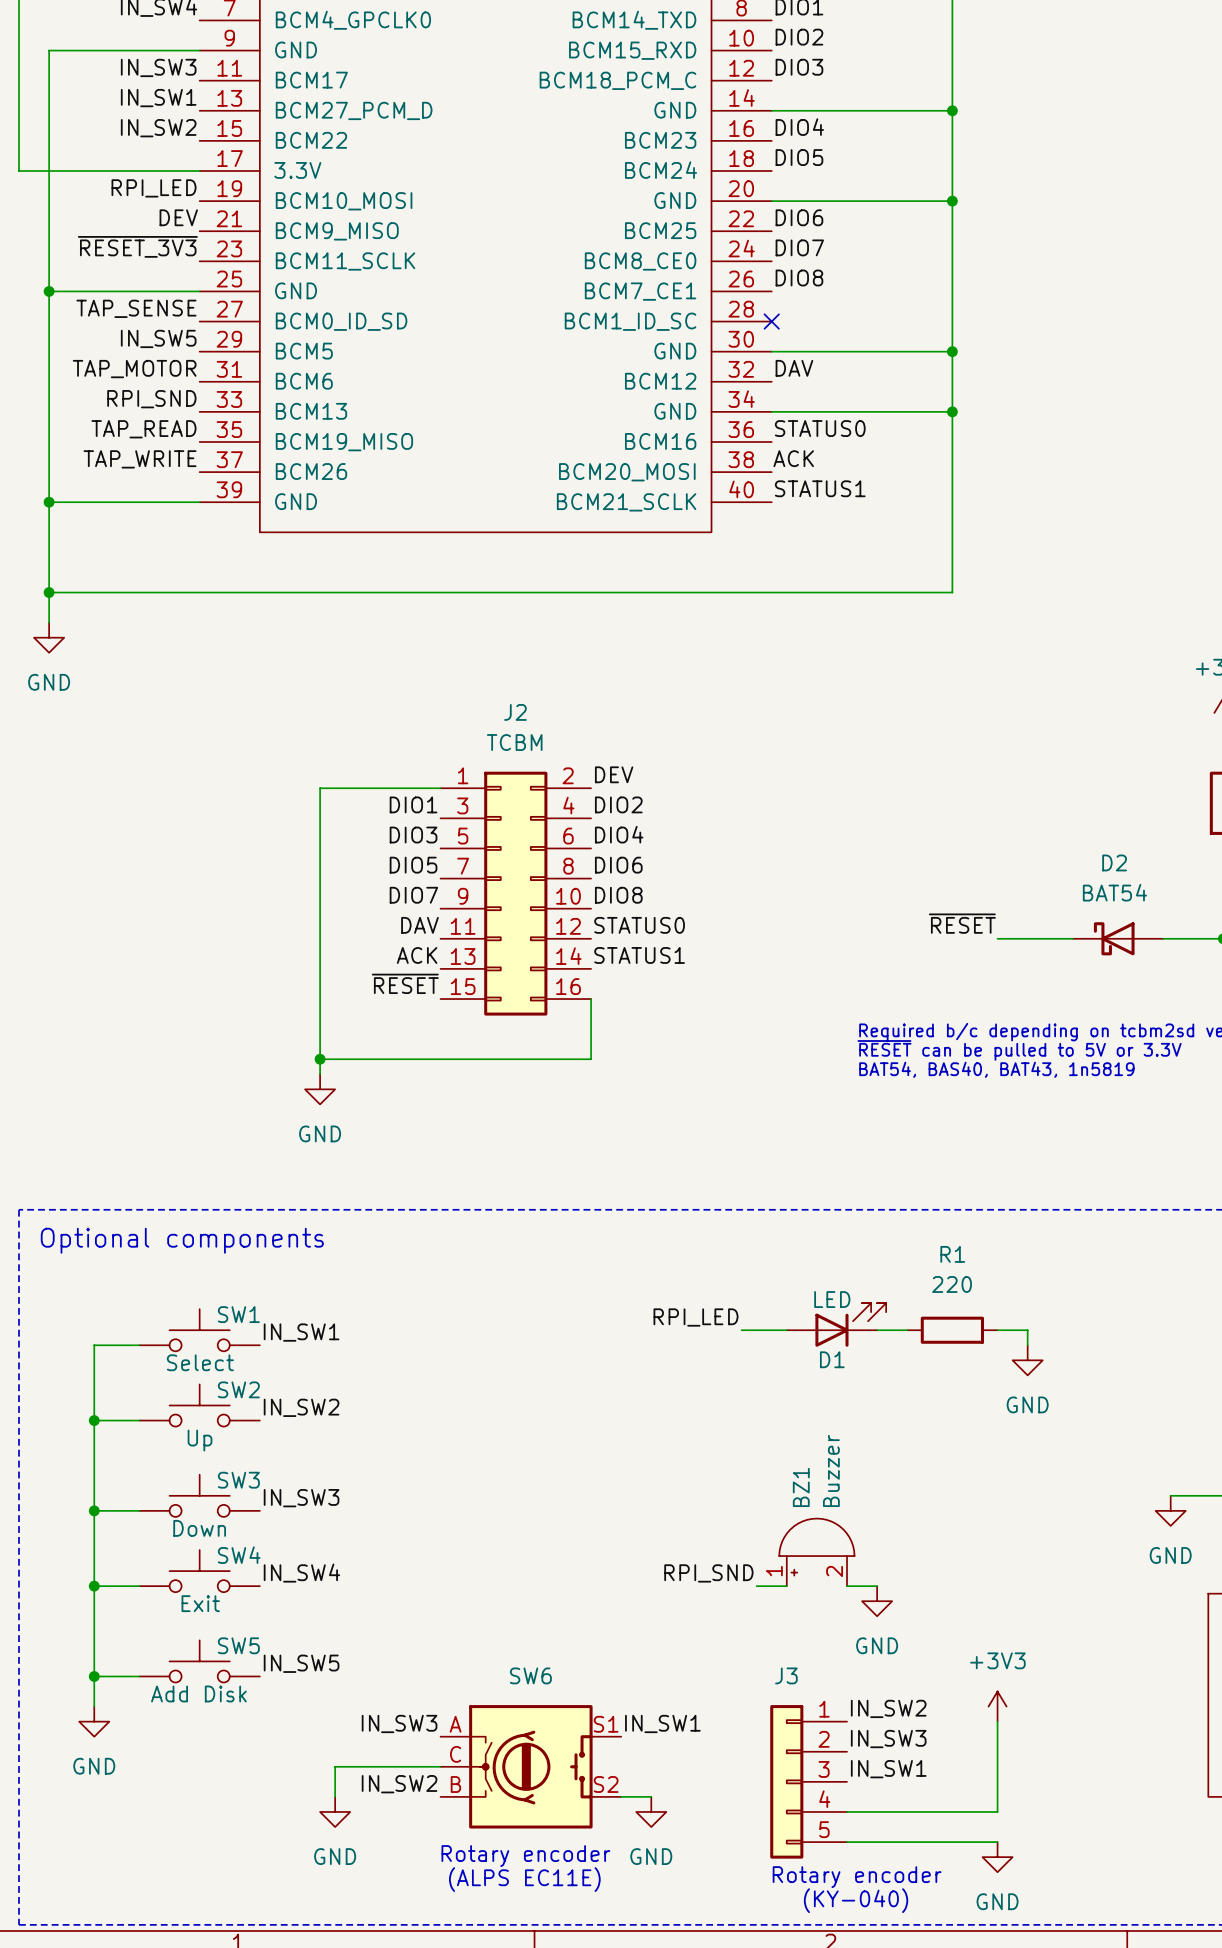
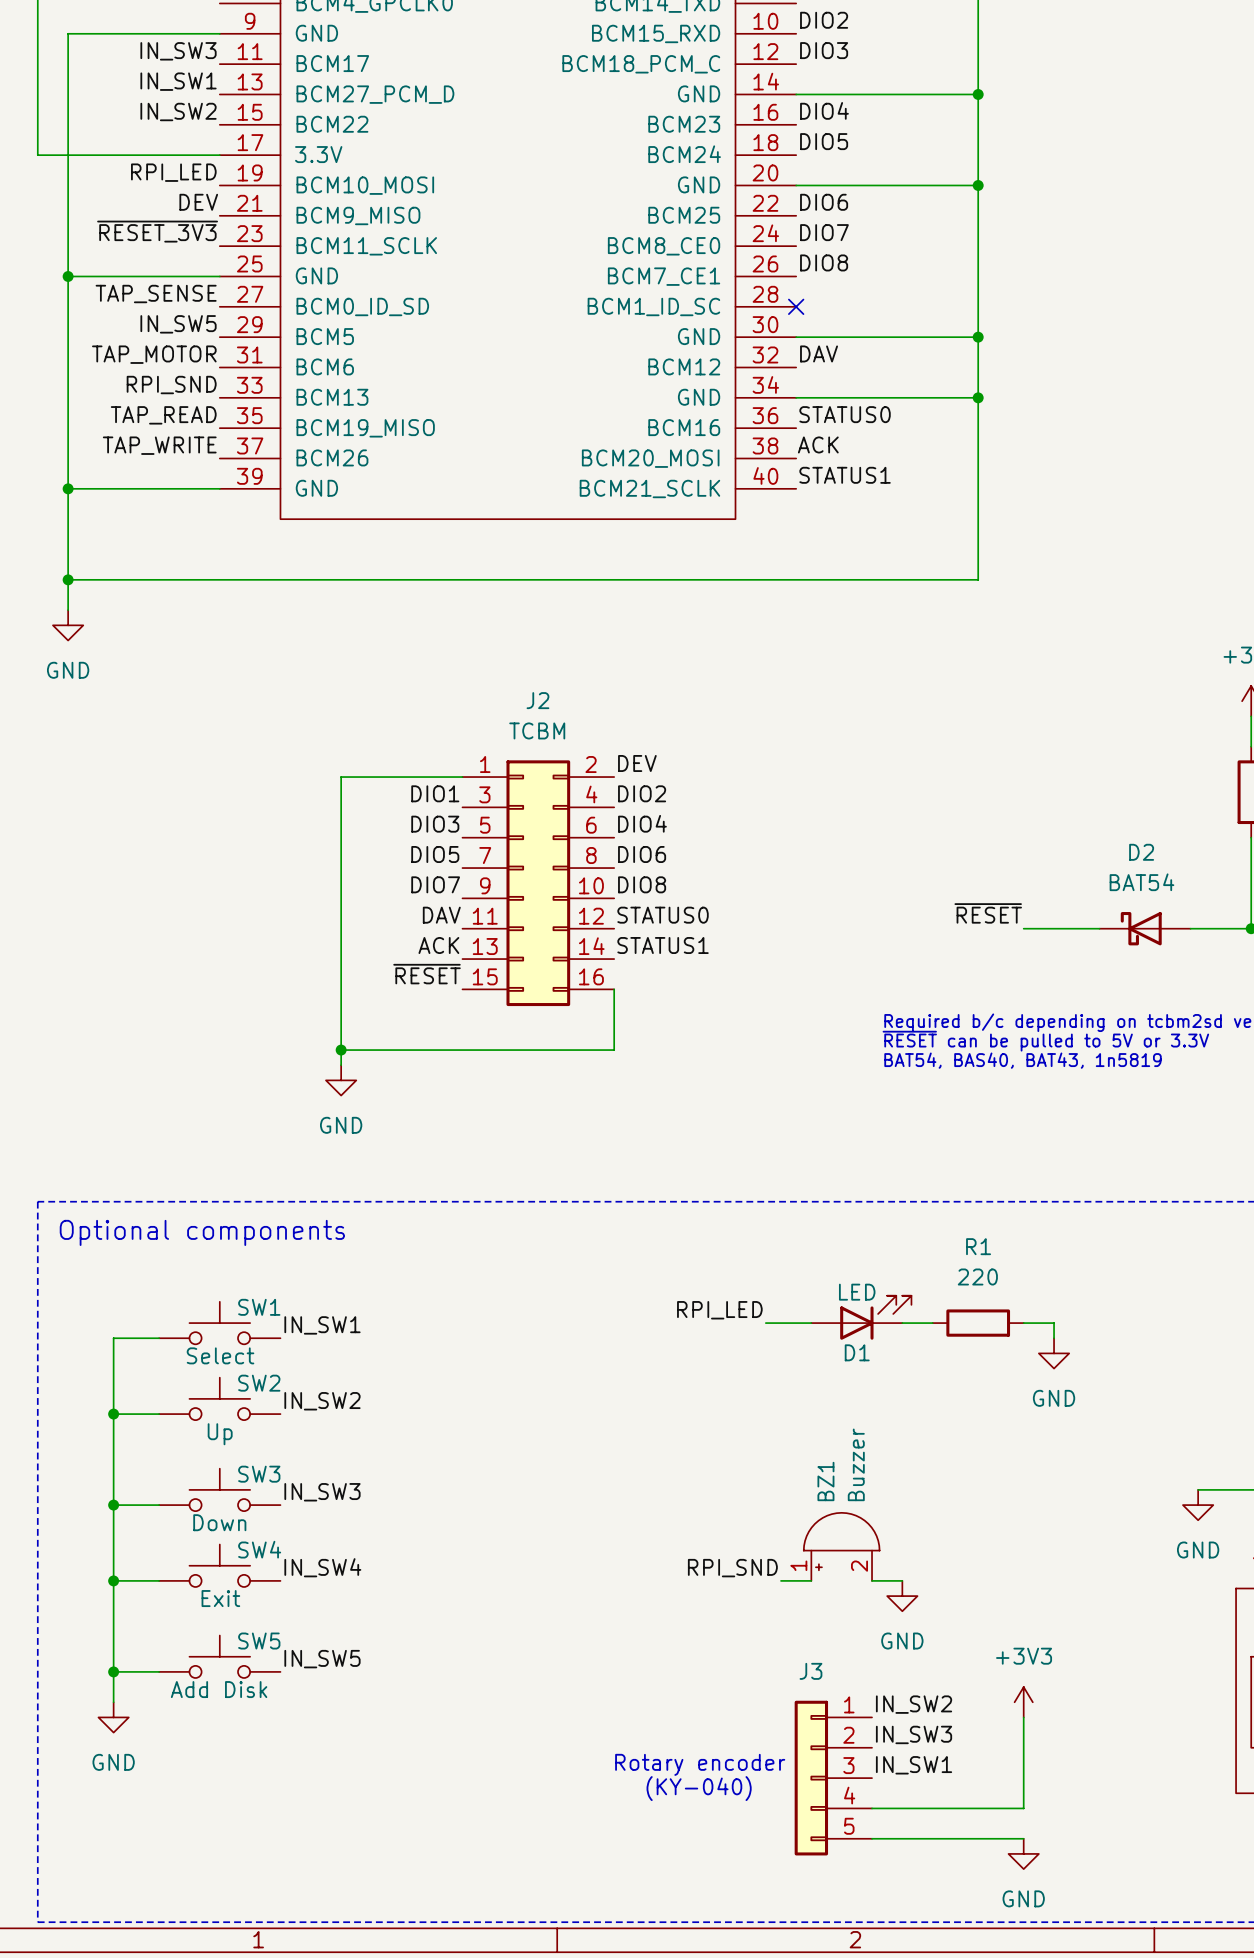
label: IN_SW3 (399, 1723) -> none
label: IN_SW1 (662, 1723) -> none
wire: (440, 1766) (335, 1766) (335, 1796) -> none
SW6: (530, 1766) -> none
text: none -> Rotary encoder (700, 1764)
label: IN_SW2 (399, 1784) -> none
wire: (621, 1796) (651, 1796) -> none
power symbol: GND (335, 1811) -> none
power symbol: GND (651, 1811) -> none
text: Rotary encoder (525, 1856) -> none
text: Rotary encoder (857, 1877) -> none
text: (ALPS EC11E) (524, 1879) -> none
text position: (KY-040) (856, 1900) -> (KY-040) (699, 1788)

